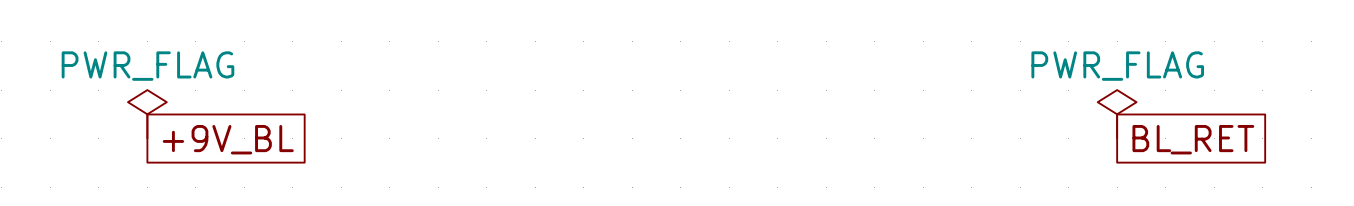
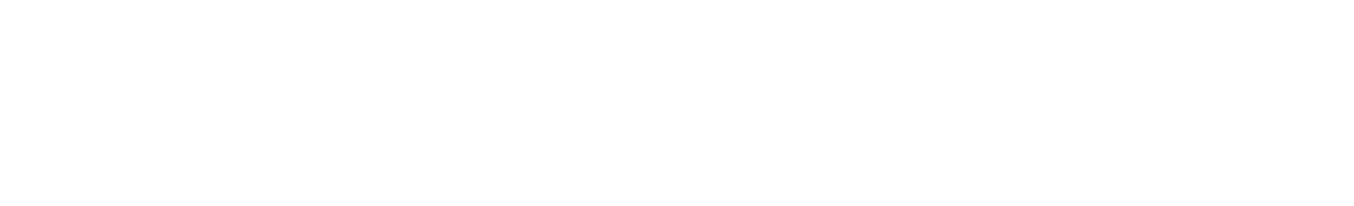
power symbol: PWR_FLAG (147, 114) -> none
power symbol: PWR_FLAG (1117, 114) -> none
global label: +9V_BL (228, 139) -> none
global label: BL_RET (1193, 139) -> none

